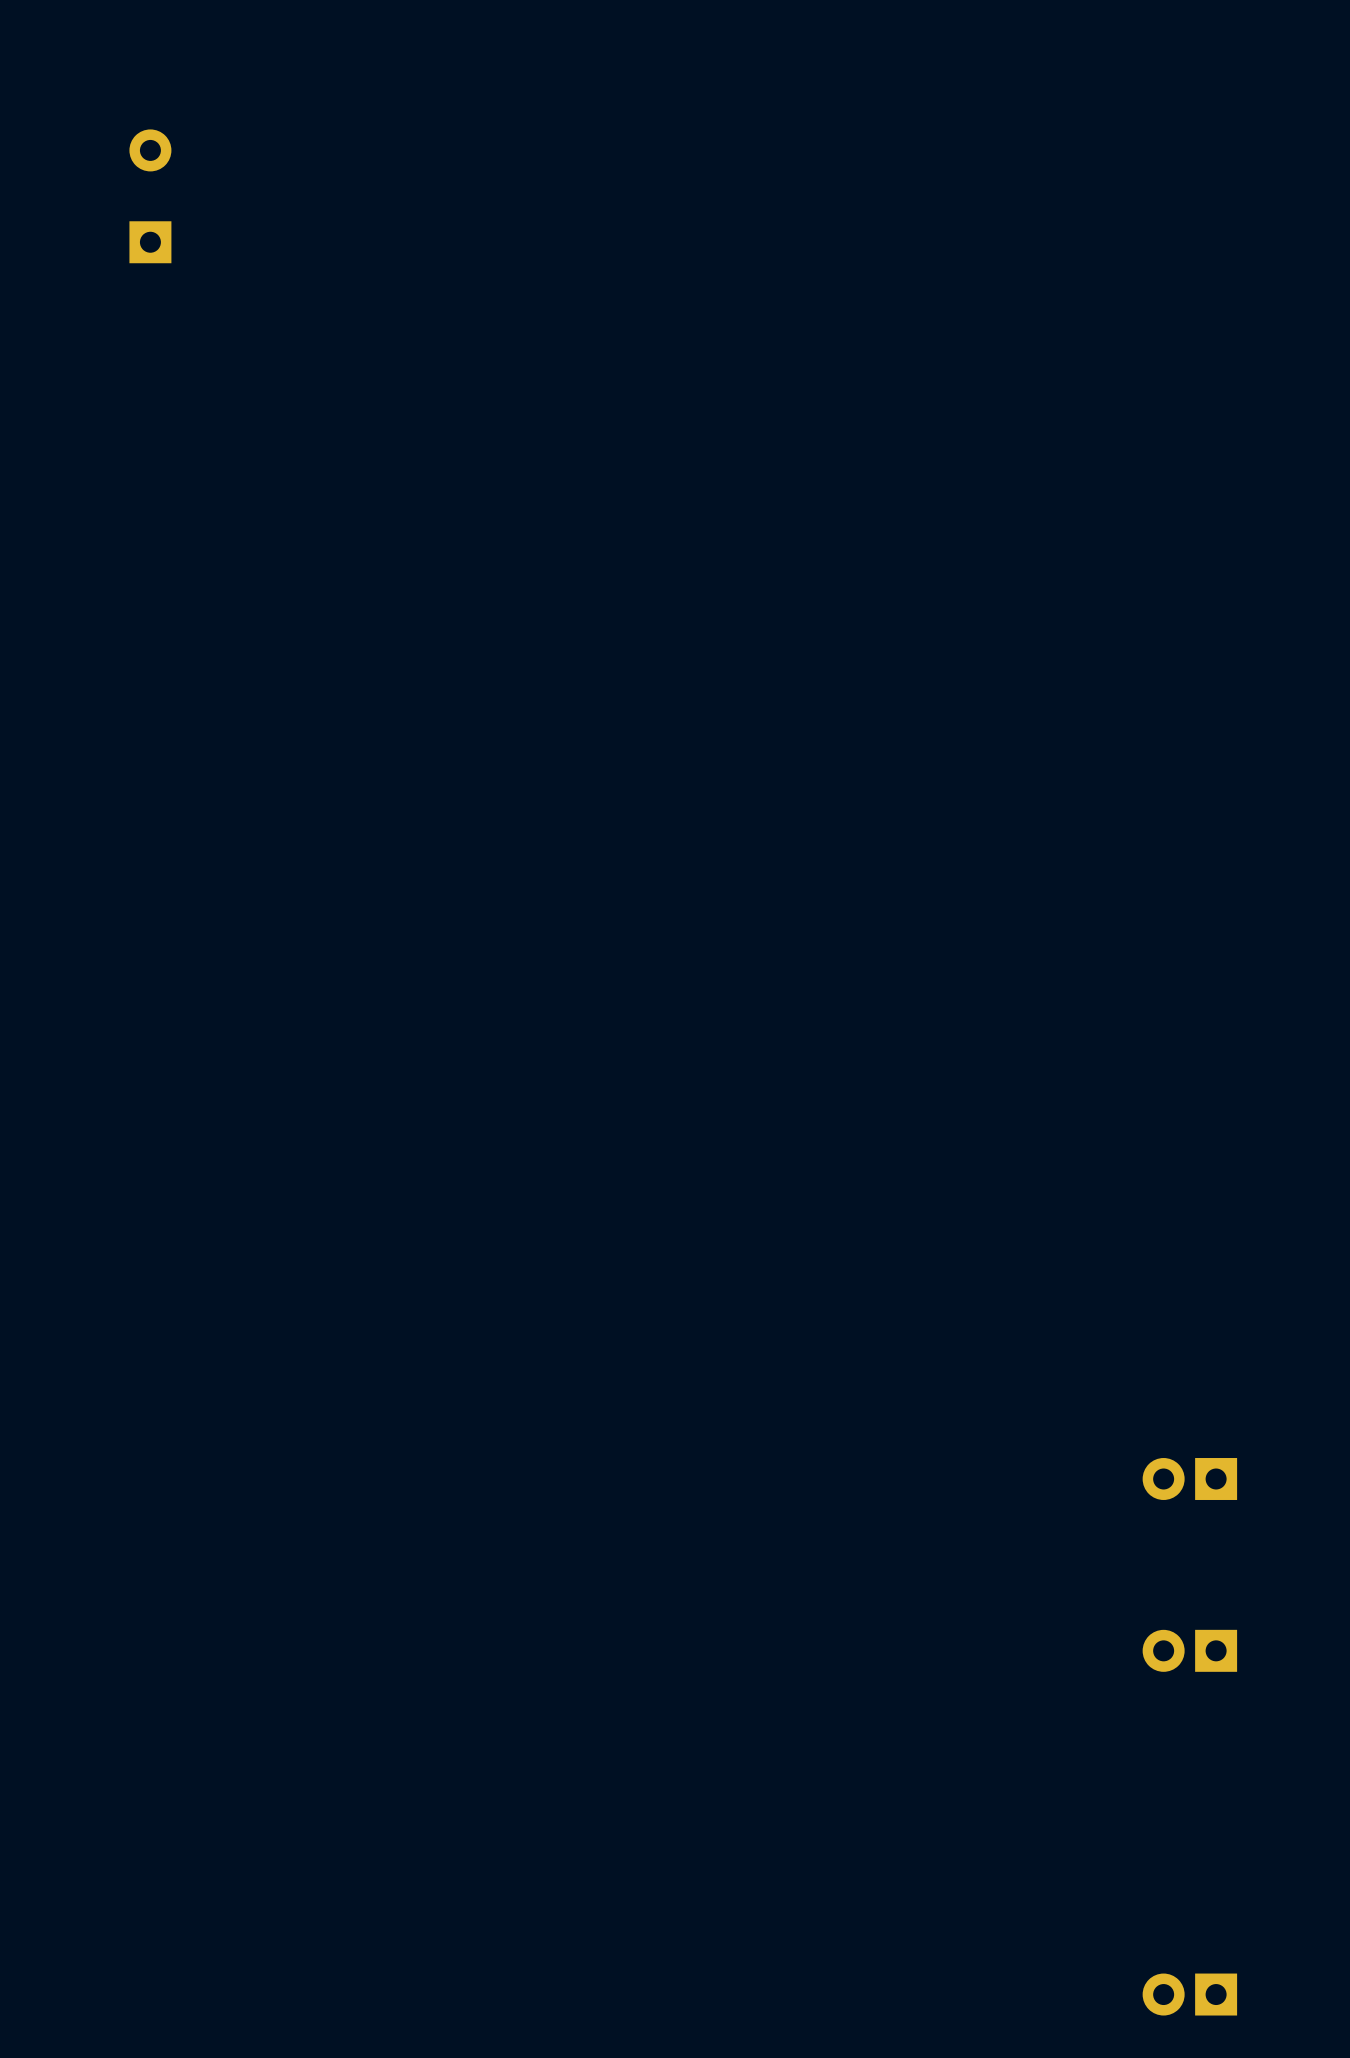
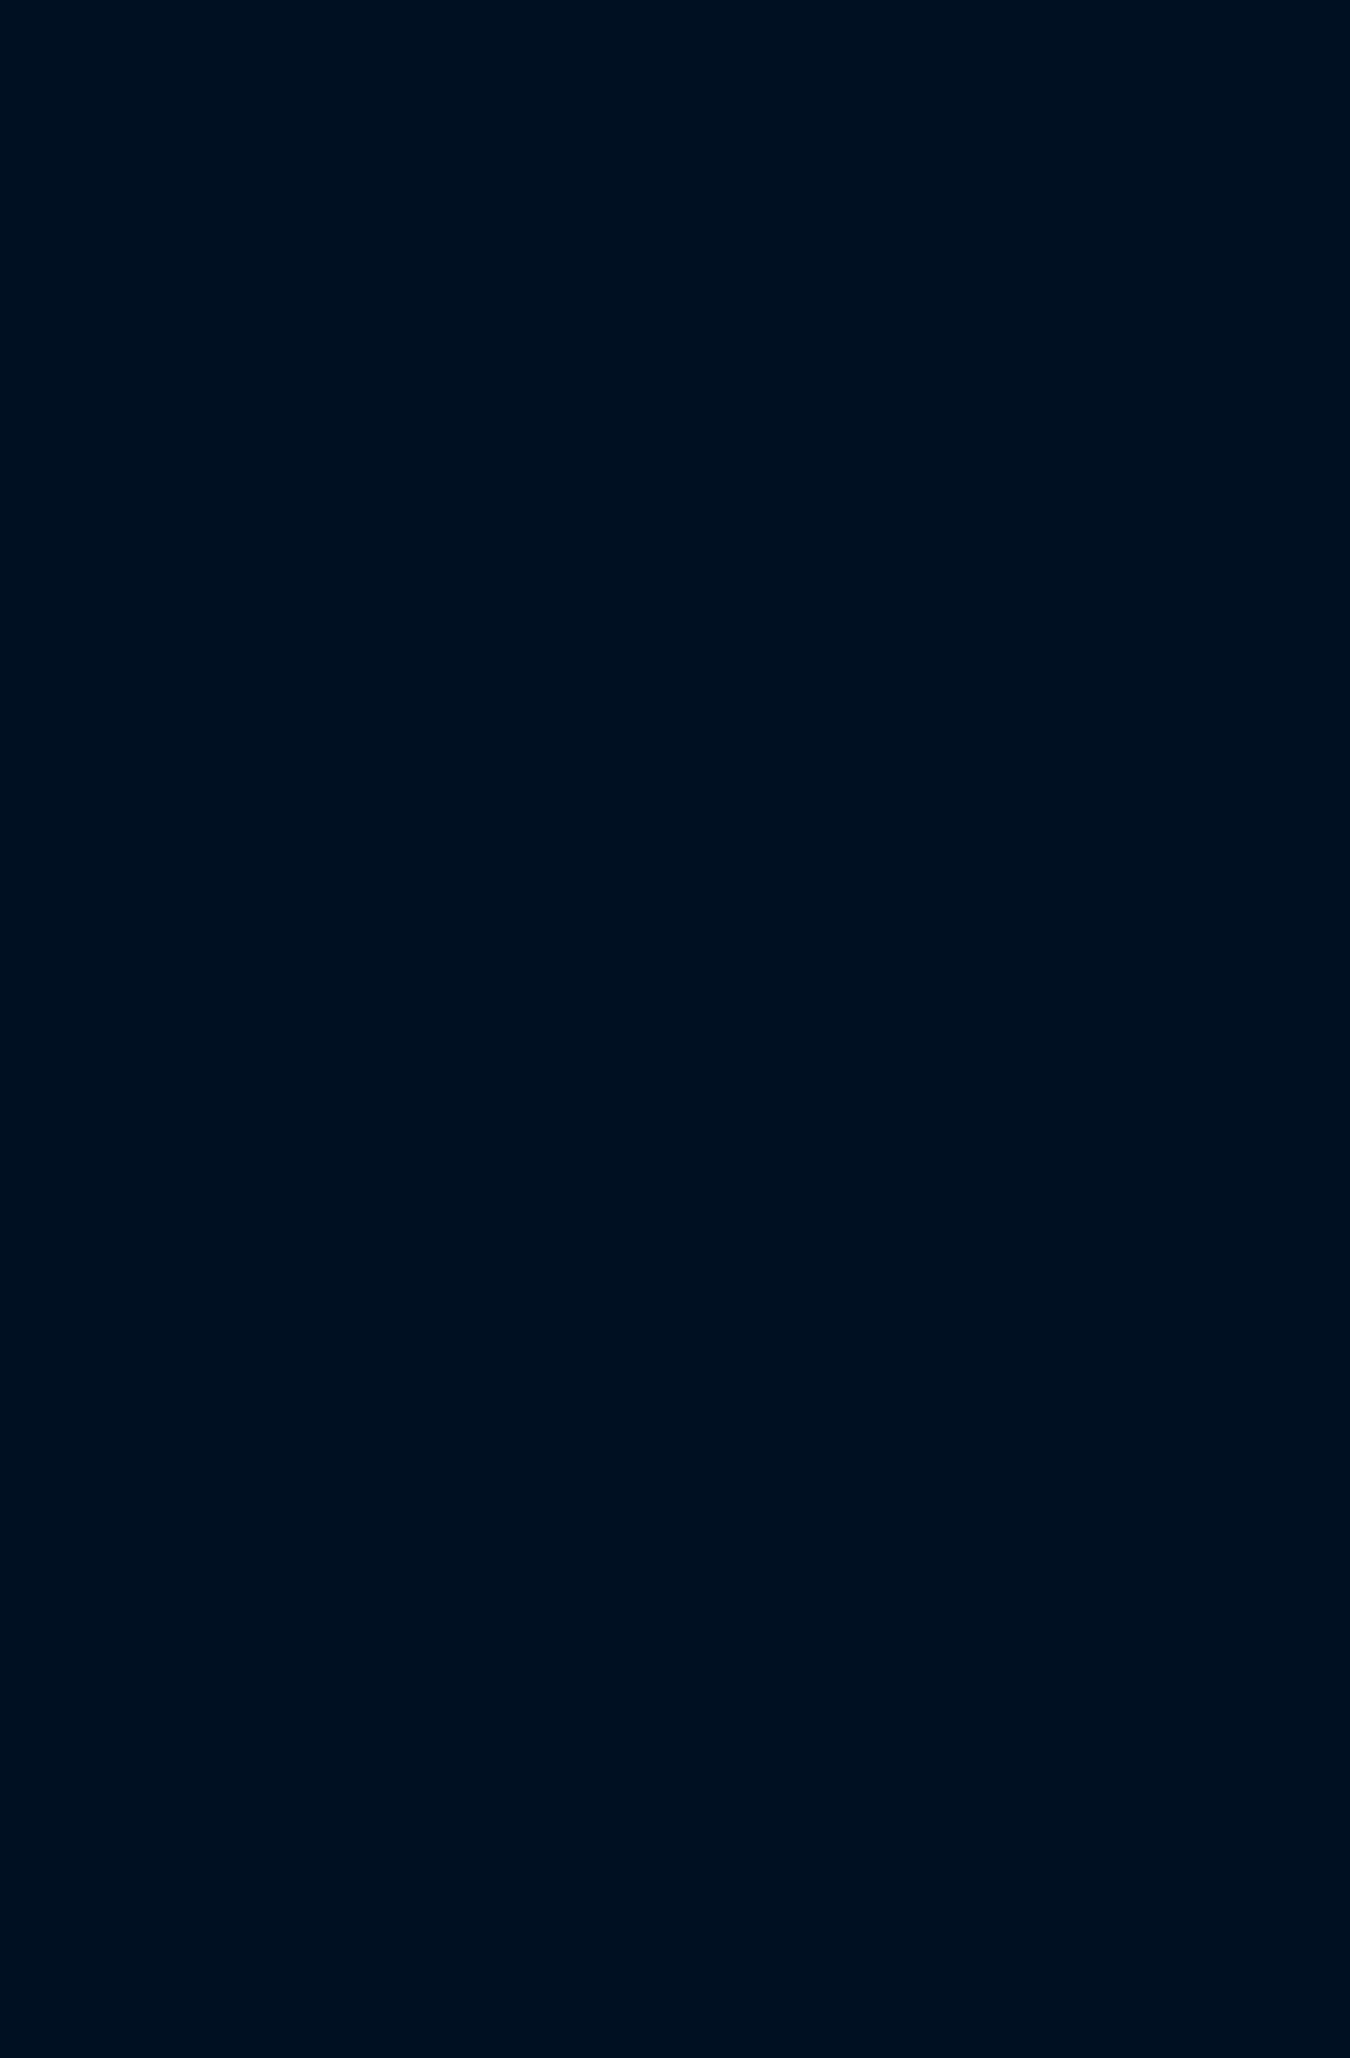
part: (150, 196) -> none
part: (1189, 1479) -> none
part: (1189, 1650) -> none
part: (1189, 1994) -> none

